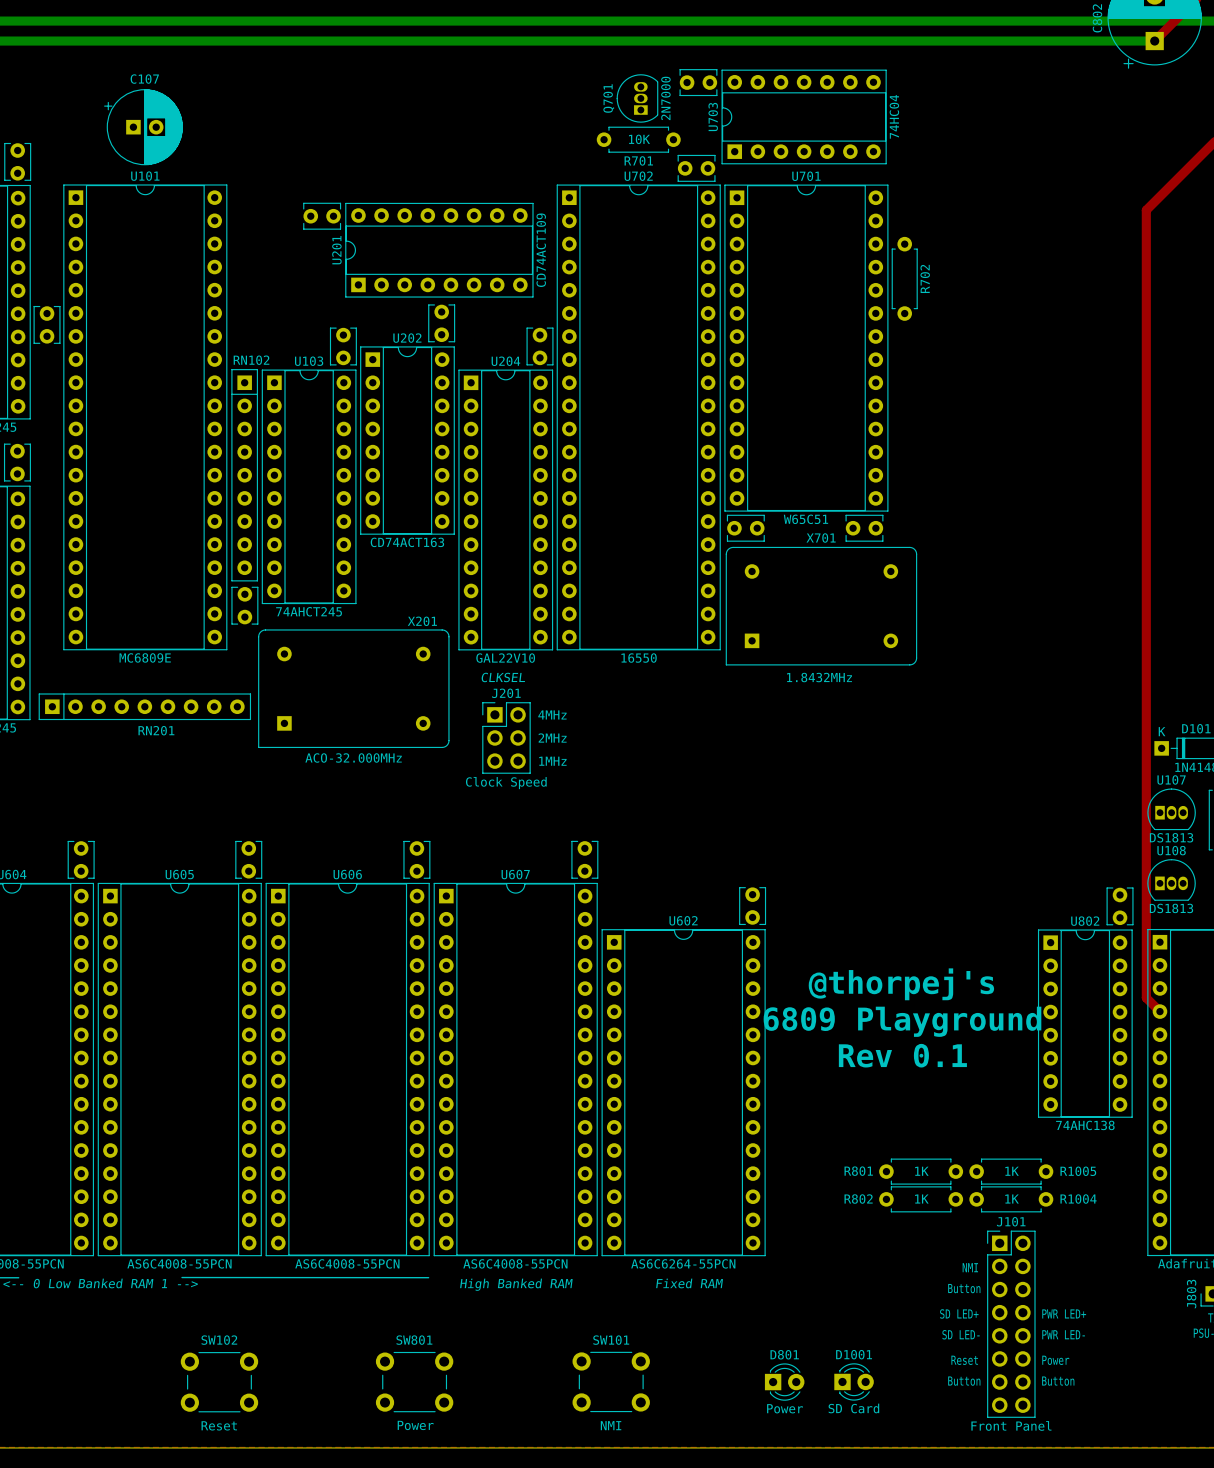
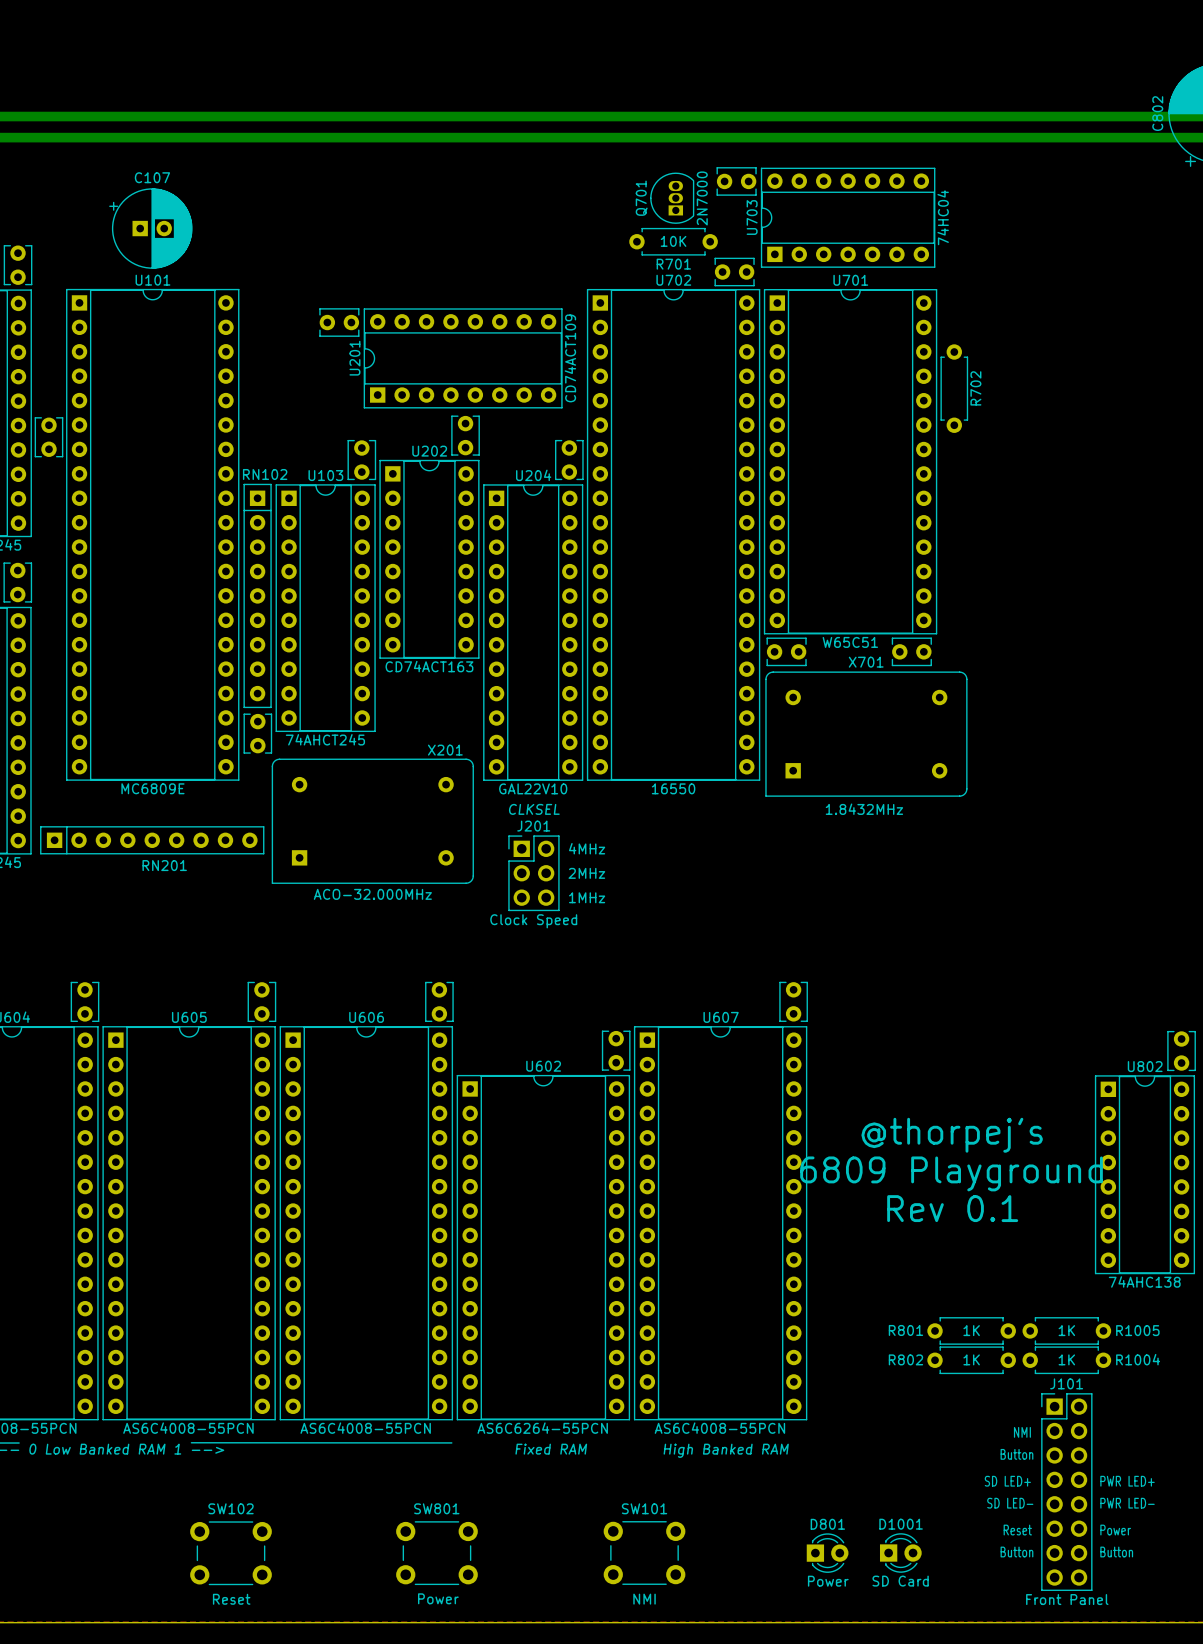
part position: (584, 859) -> (616, 1050)
part position: (752, 906) -> (793, 1001)
U607 position: (515, 1069) -> (720, 1223)
U602 position: (683, 1092) -> (543, 1247)
text position: Fixed RAM (689, 1283) -> Fixed RAM (551, 1449)
text position: High Banked RAM (516, 1284) -> High Banked RAM (726, 1450)

